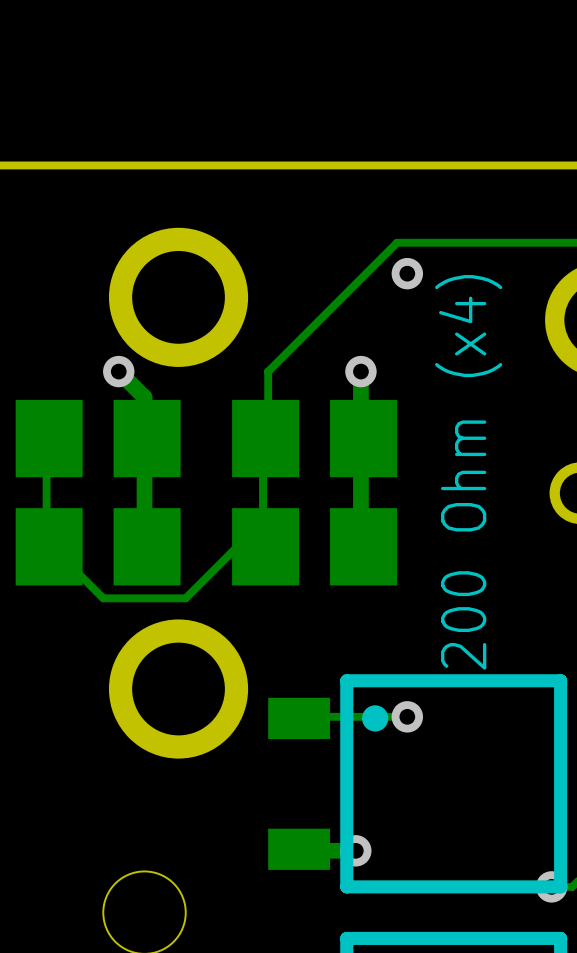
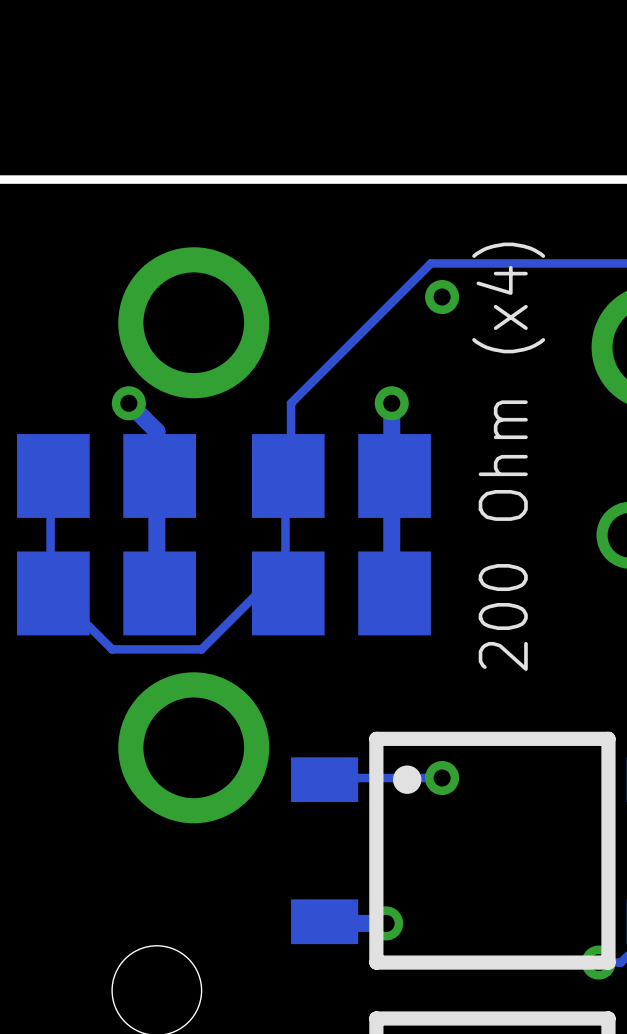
text position: 200 Ohm (x4) (468, 472) -> 200 Ohm (x4) (508, 456)

